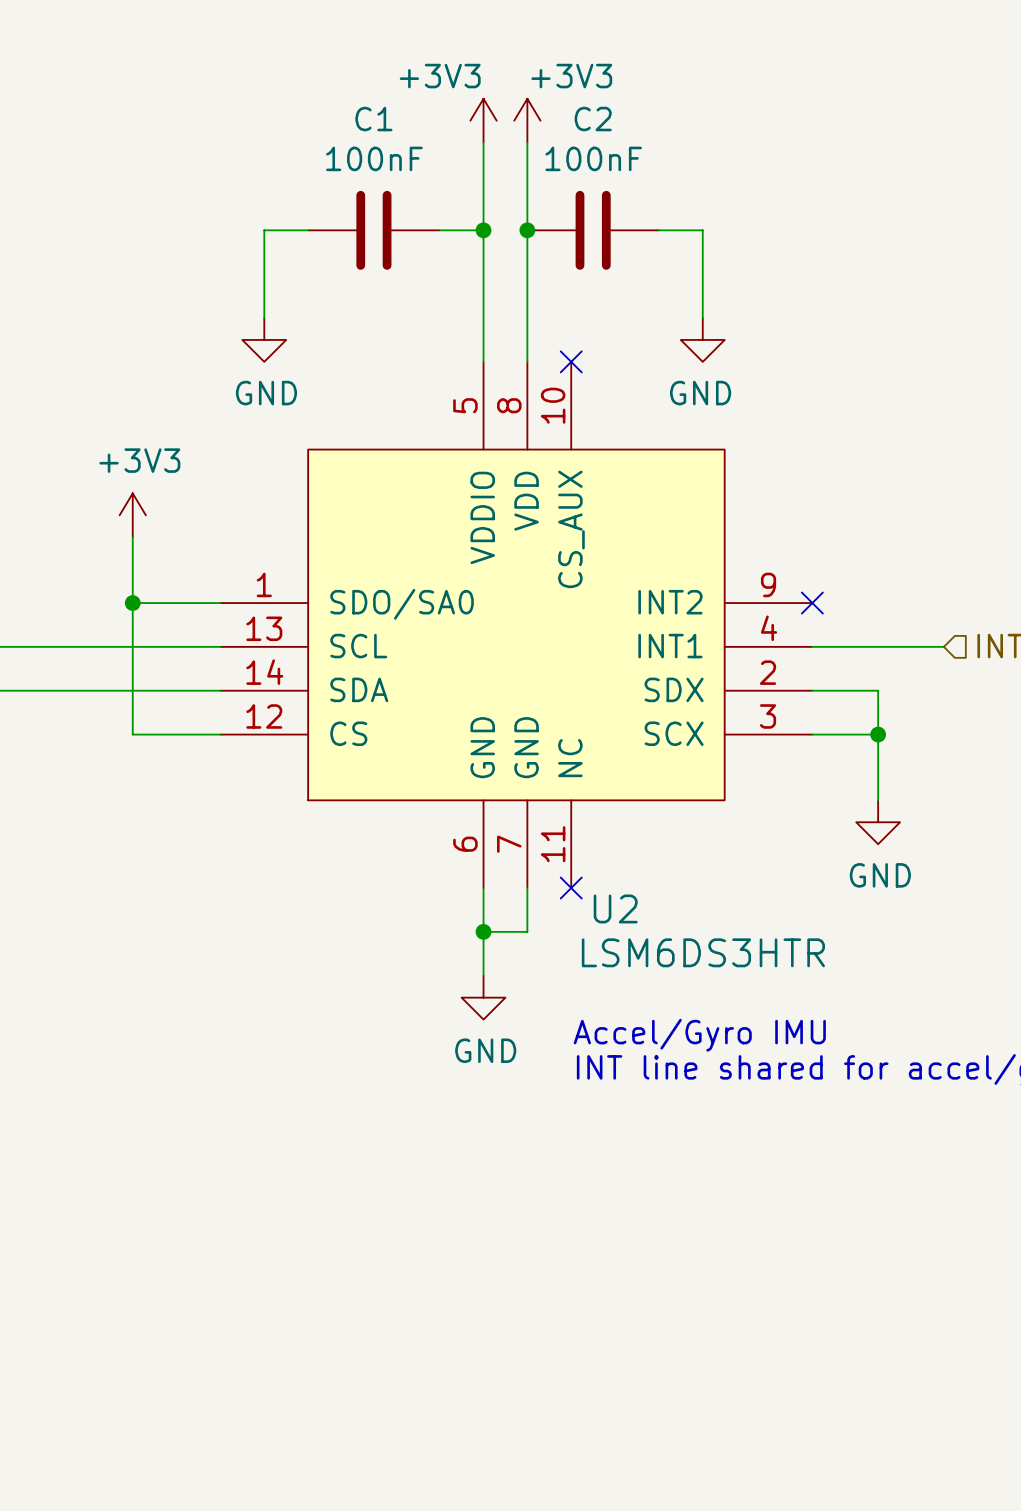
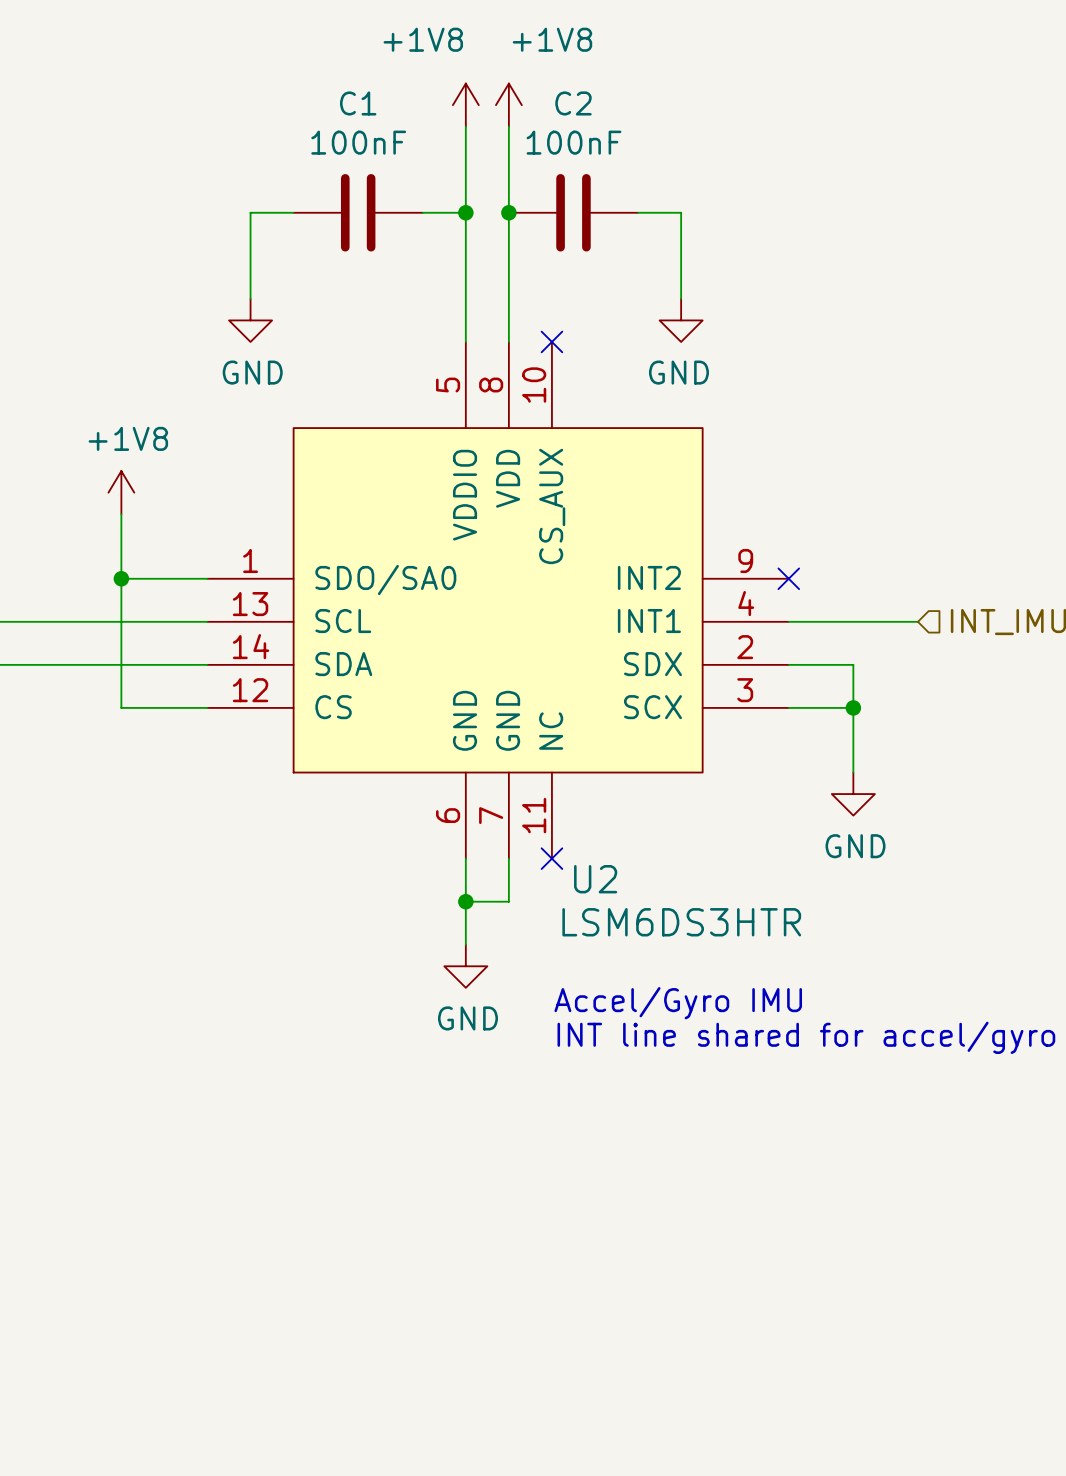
power symbol: +3V3 (483, 120) -> +1V8 (465, 105)
power symbol: +3V3 (527, 120) -> +1V8 (508, 105)
power symbol: +3V3 (132, 515) -> +1V8 (121, 492)

